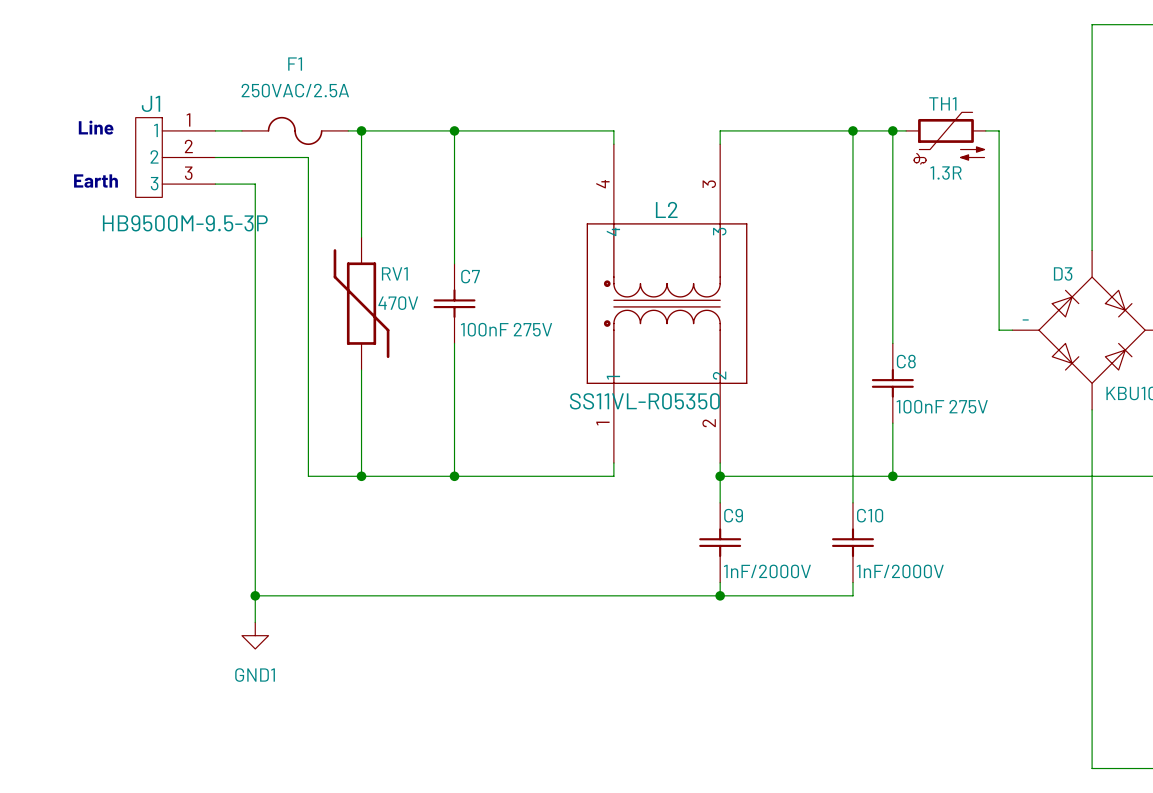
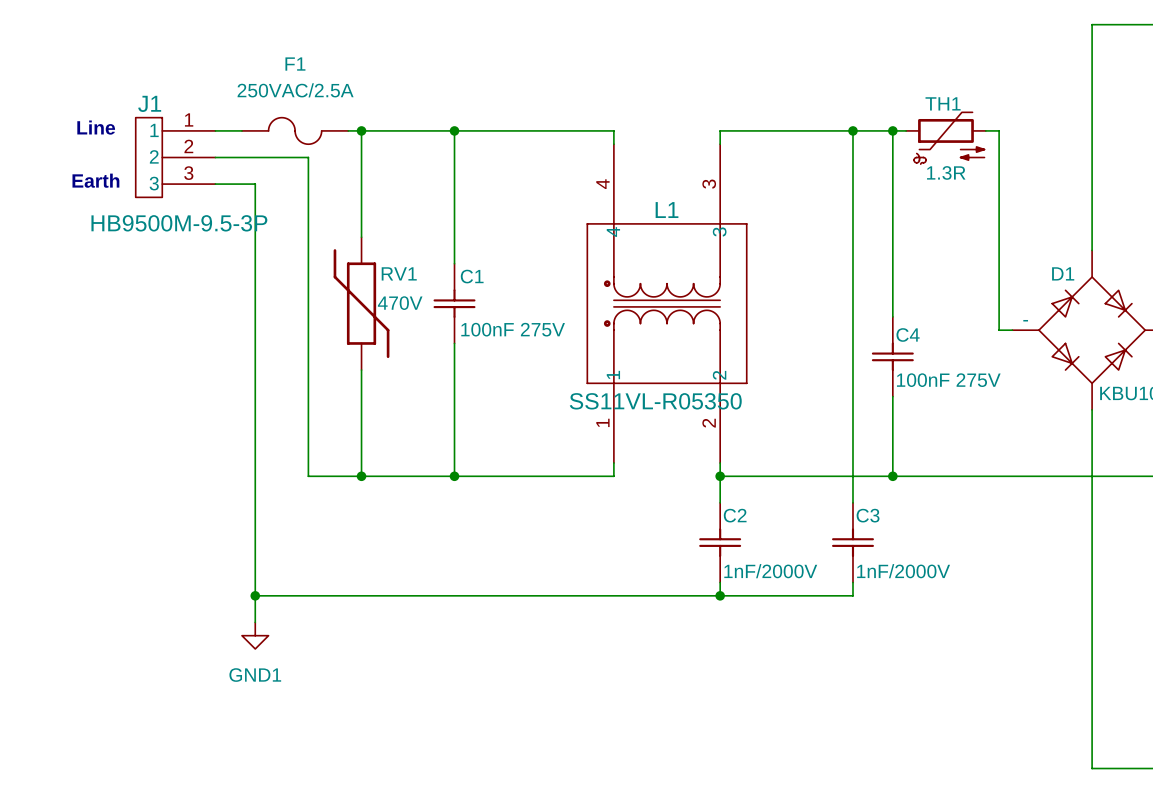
L2 name: L2 (666, 209) -> L1 (667, 210)
D3 name: D3 (1063, 273) -> D1 (1063, 273)
C7 name: C7 (470, 276) -> C1 (472, 276)
C4: none -> 100nF 275V (892, 356)
C8: 100nF 275V (892, 383) -> none
C9 name: C9 (733, 515) -> C2 (735, 515)
C10 name: C10 (870, 515) -> C3 (868, 515)

